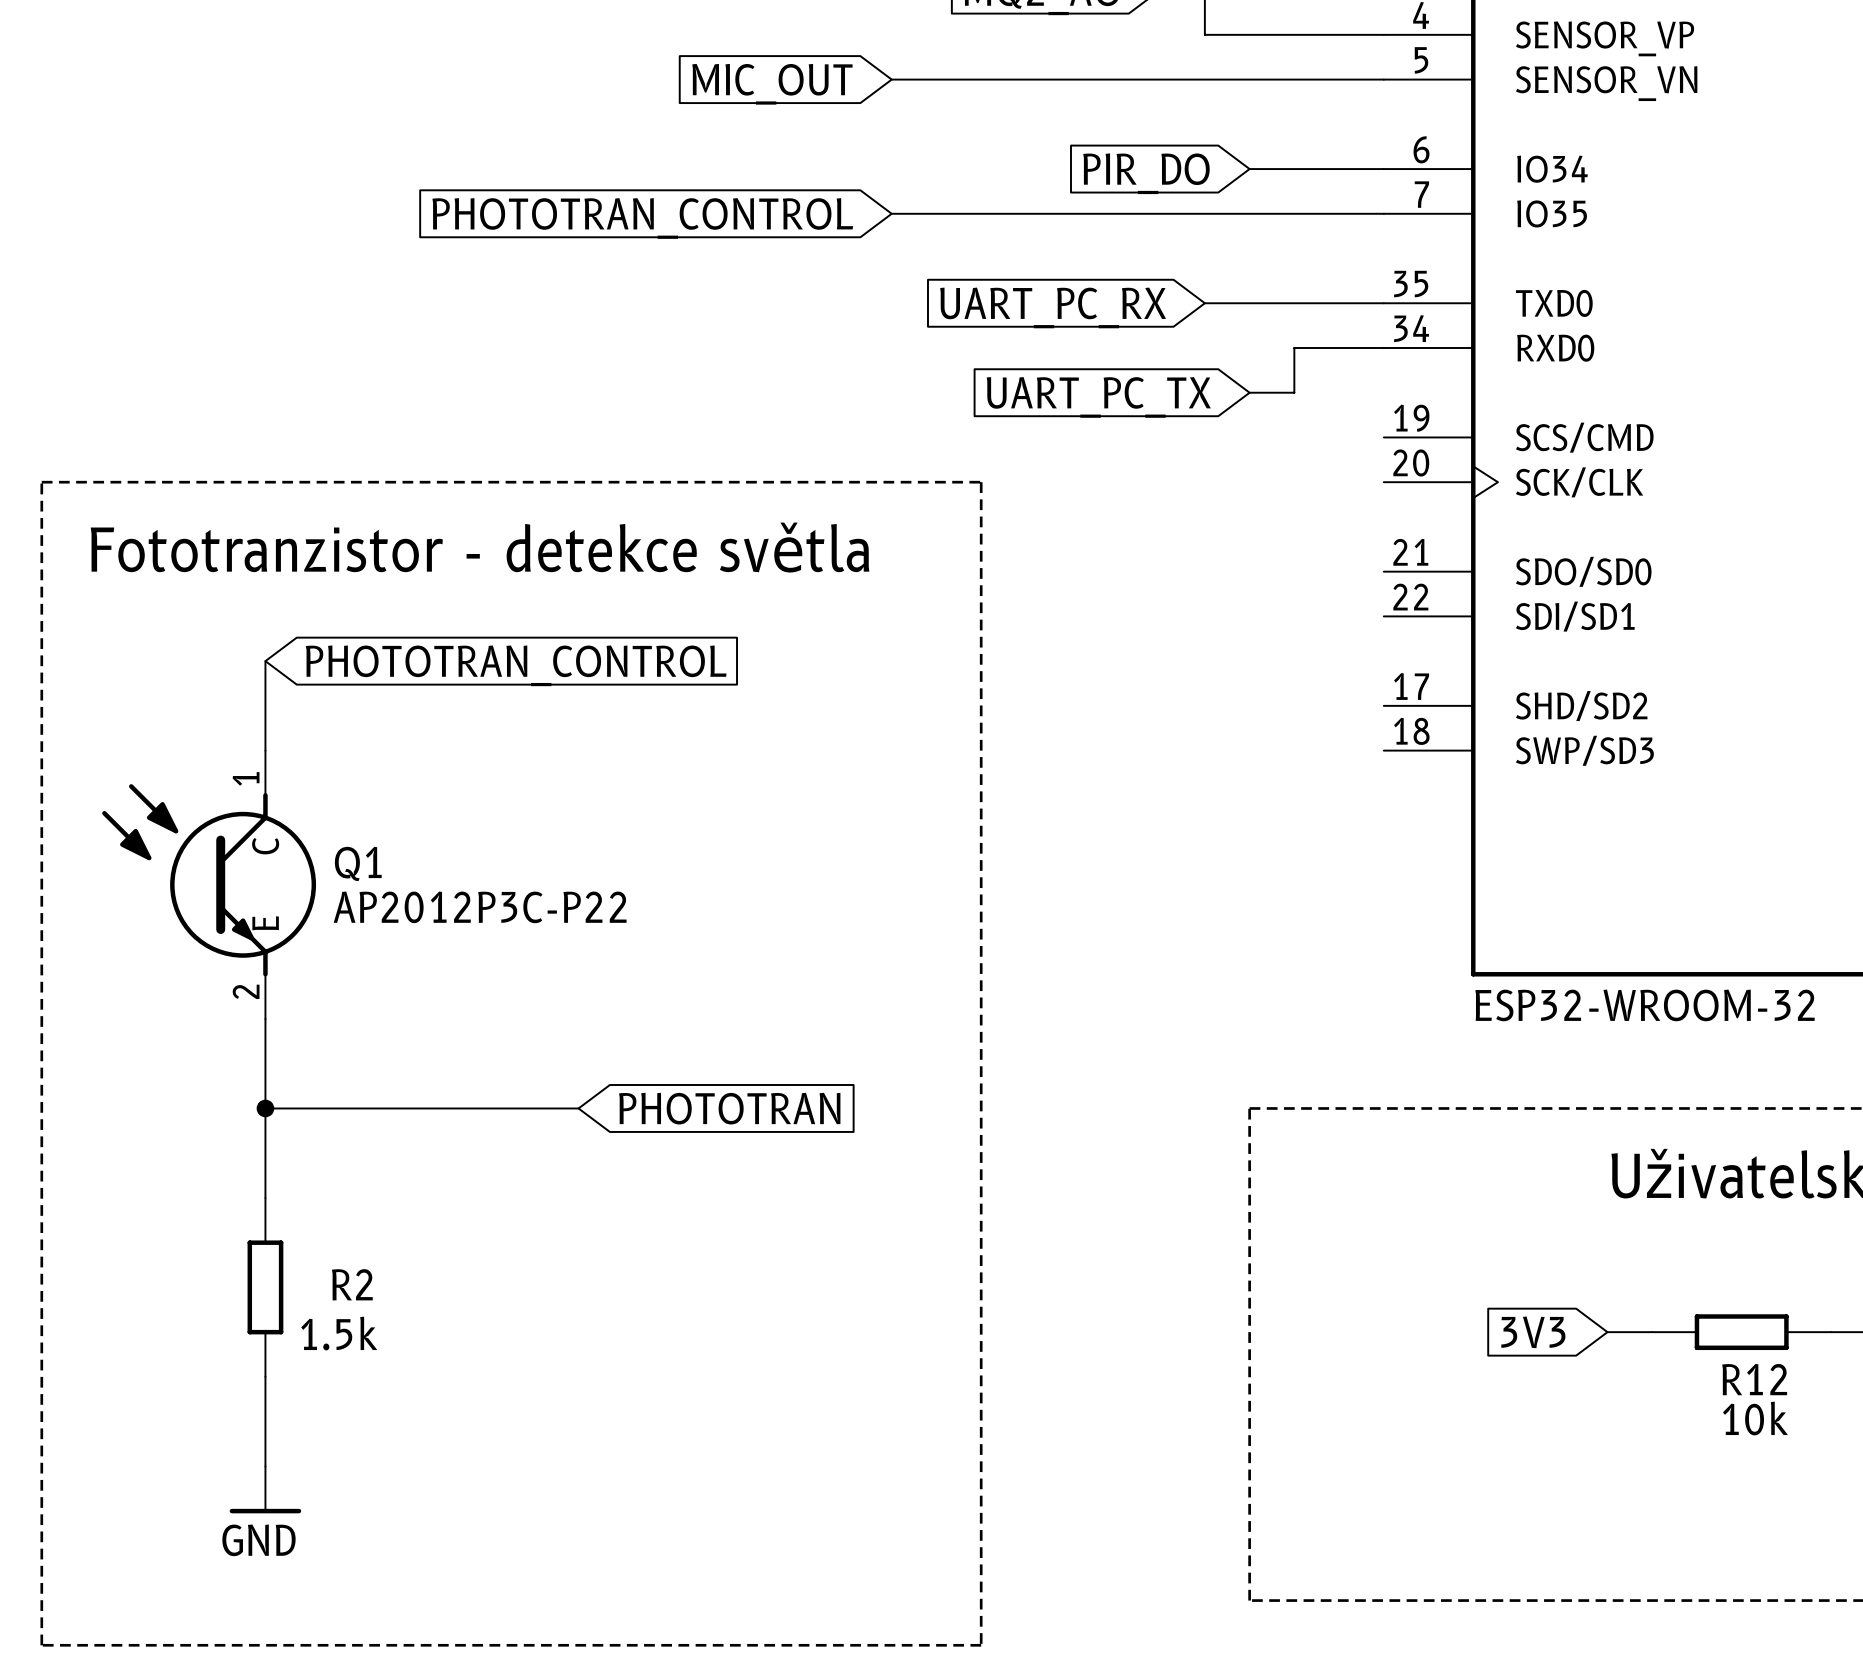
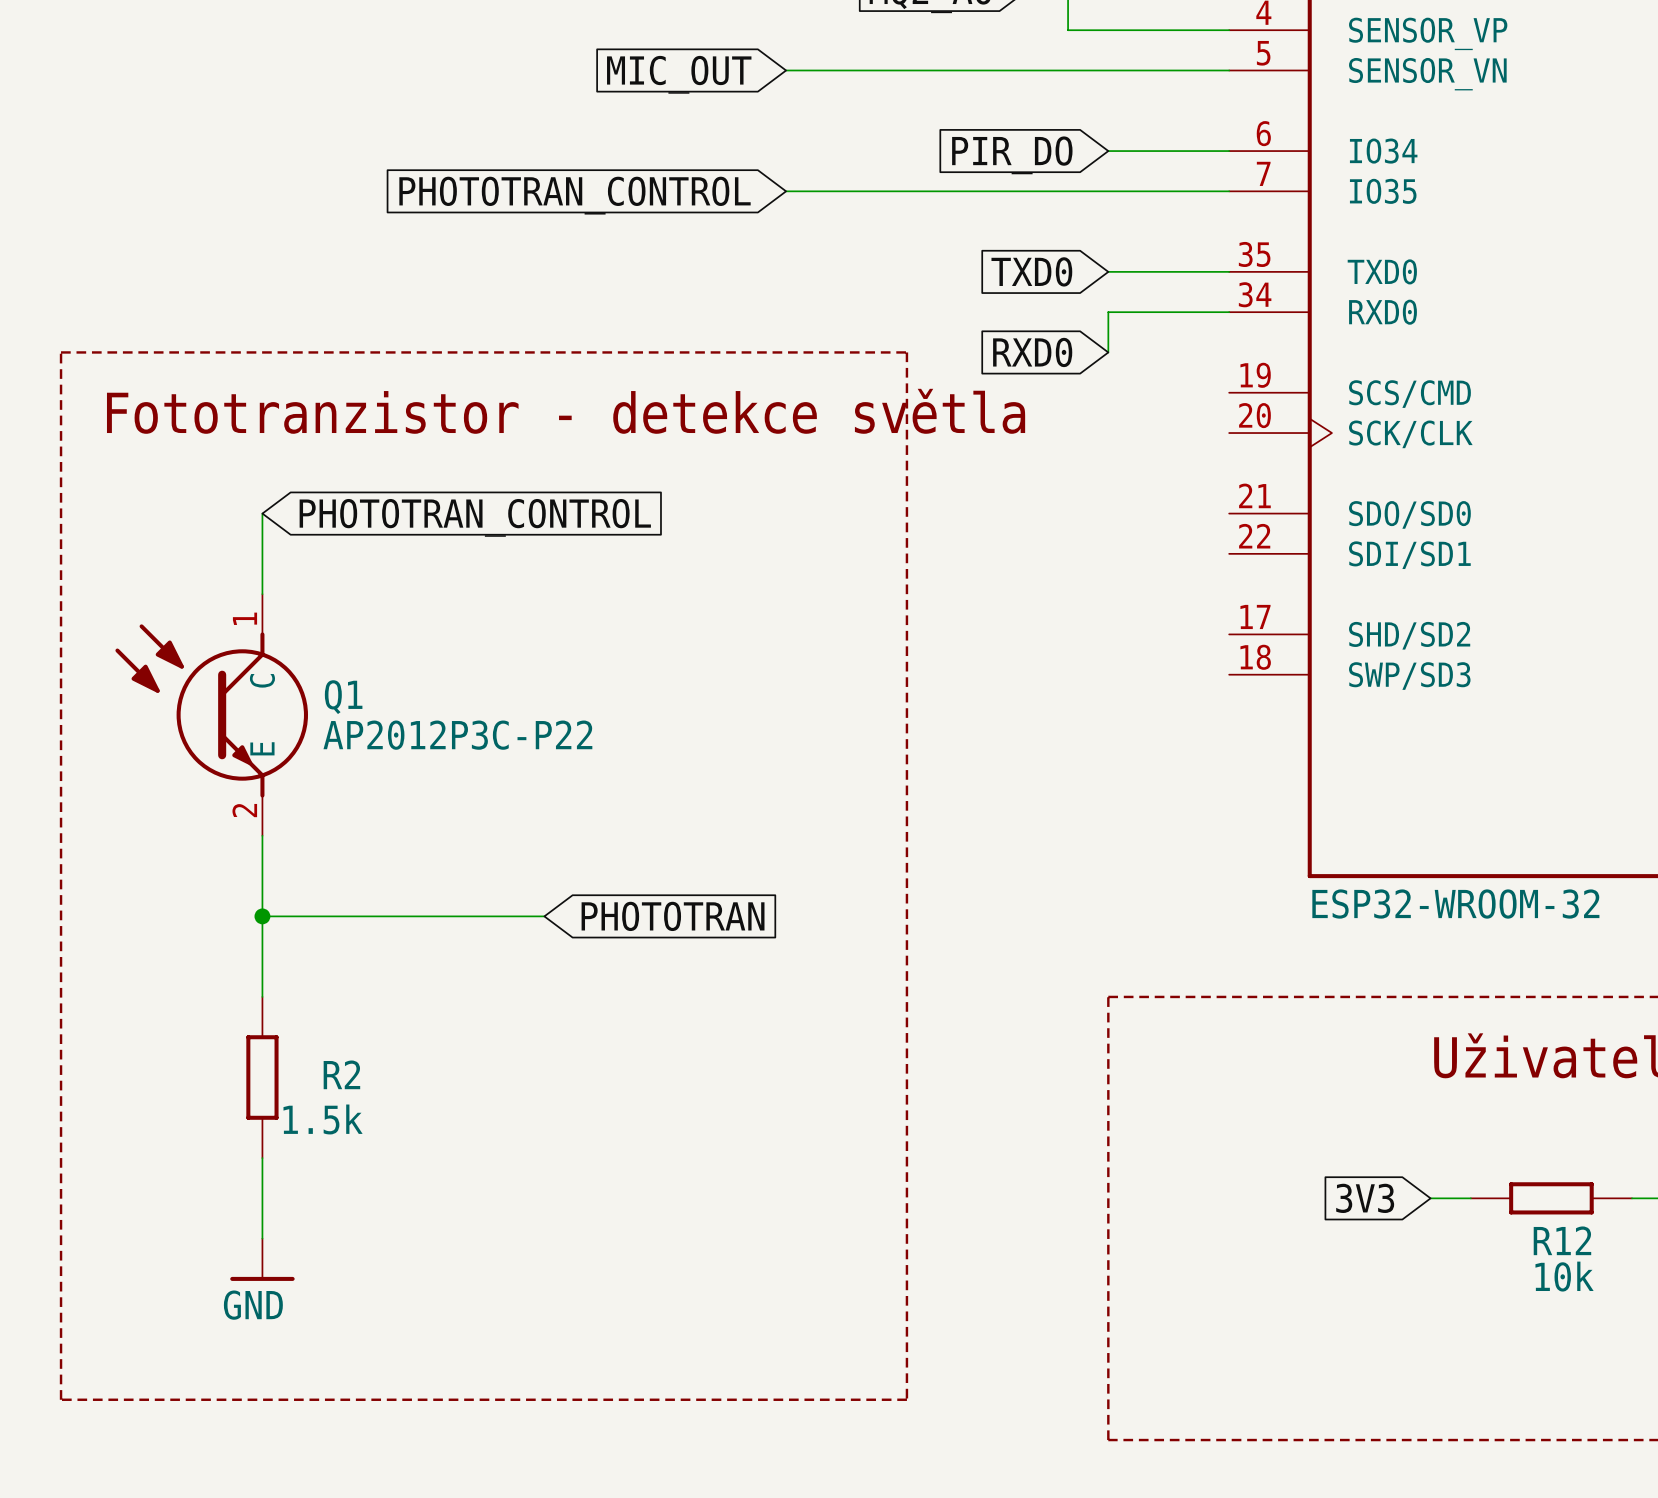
global label: none -> TXD0 (1031, 271)
wire: (1204, 303) (1249, 303) -> none
global label: UART_PC_RX (1053, 307) -> none
wire: (1294, 347) (1294, 392) (1249, 392) -> (1148, 312) (1108, 312) (1108, 352)
global label: UART_PC_TX (1098, 397) -> RXD0 (1032, 352)
line: (41, 482) (41, 1645) (981, 1645) (981, 482) (41, 482) -> (61, 352) (61, 1399) (906, 1399) (906, 352) (61, 352)
text position: Fototranzistor - detekce světla (480, 547) -> Fototranzistor - detekce světla (566, 411)
wire: (265, 661) (265, 750) -> (262, 513) (262, 594)
global label position: PHOTOTRAN_CONTROL (516, 665) -> PHOTOTRAN_CONTROL (475, 517)
Q1 position: (209, 884) -> (211, 714)
wire: (265, 1019) (265, 1197) -> (262, 835) (262, 996)
wire: (265, 1108) (578, 1108) -> (262, 916) (544, 916)
junction position: (265, 1108) -> (262, 916)
global label position: PHOTOTRAN (729, 1108) -> PHOTOTRAN (673, 916)
R2 position: (265, 1287) -> (262, 1077)
wire: (265, 1376) (265, 1466) -> (262, 1158) (262, 1238)
power symbol position: GND (265, 1489) -> GND (262, 1259)

